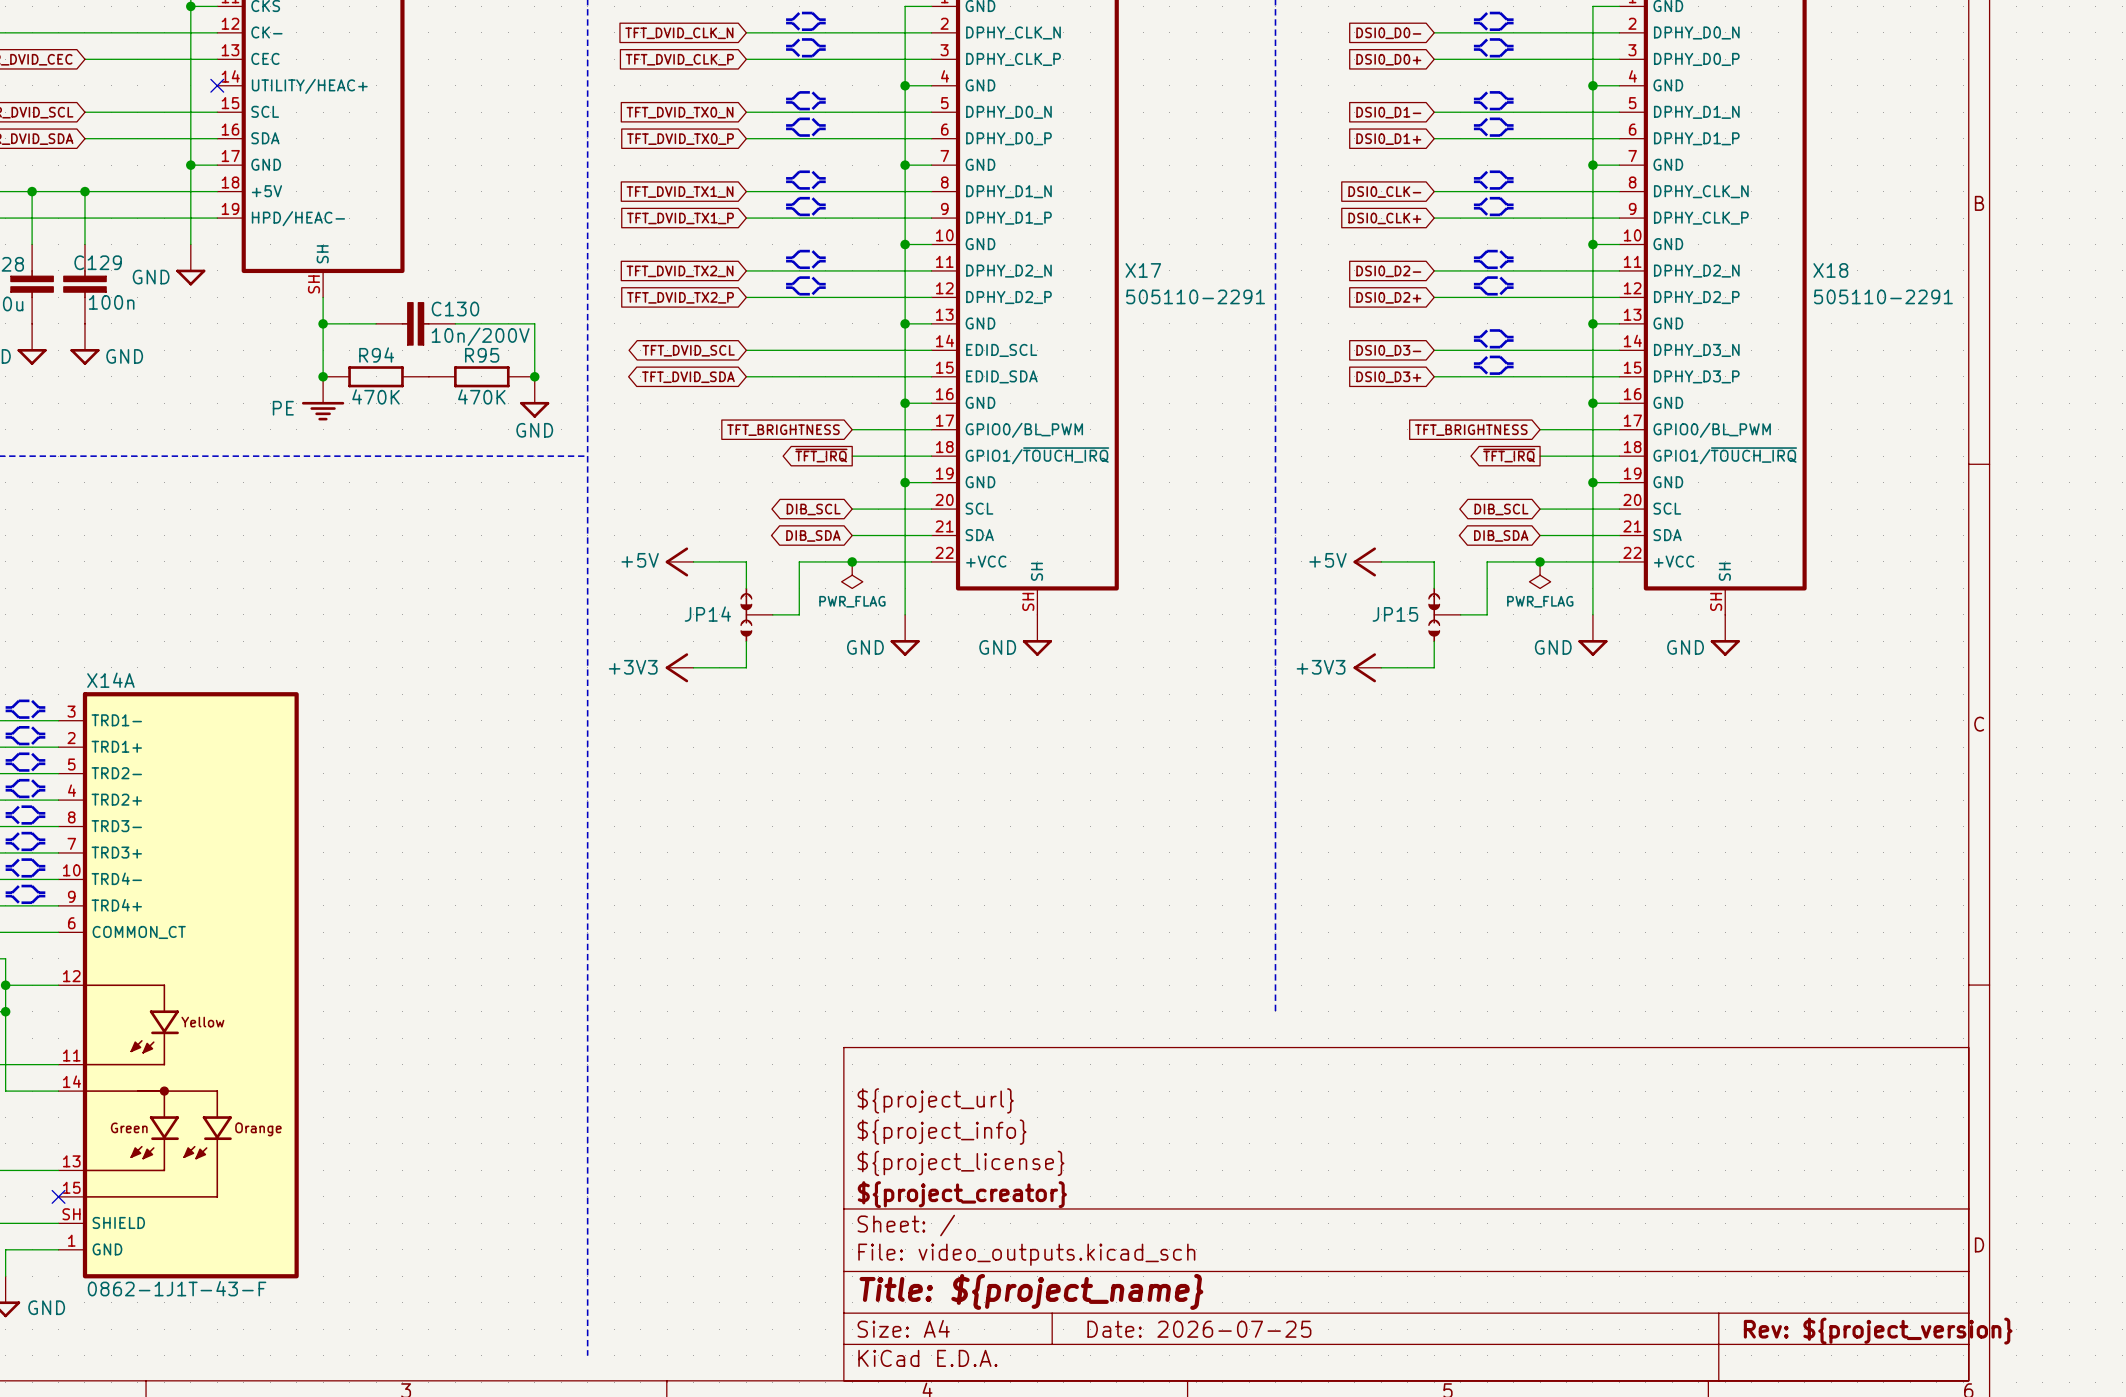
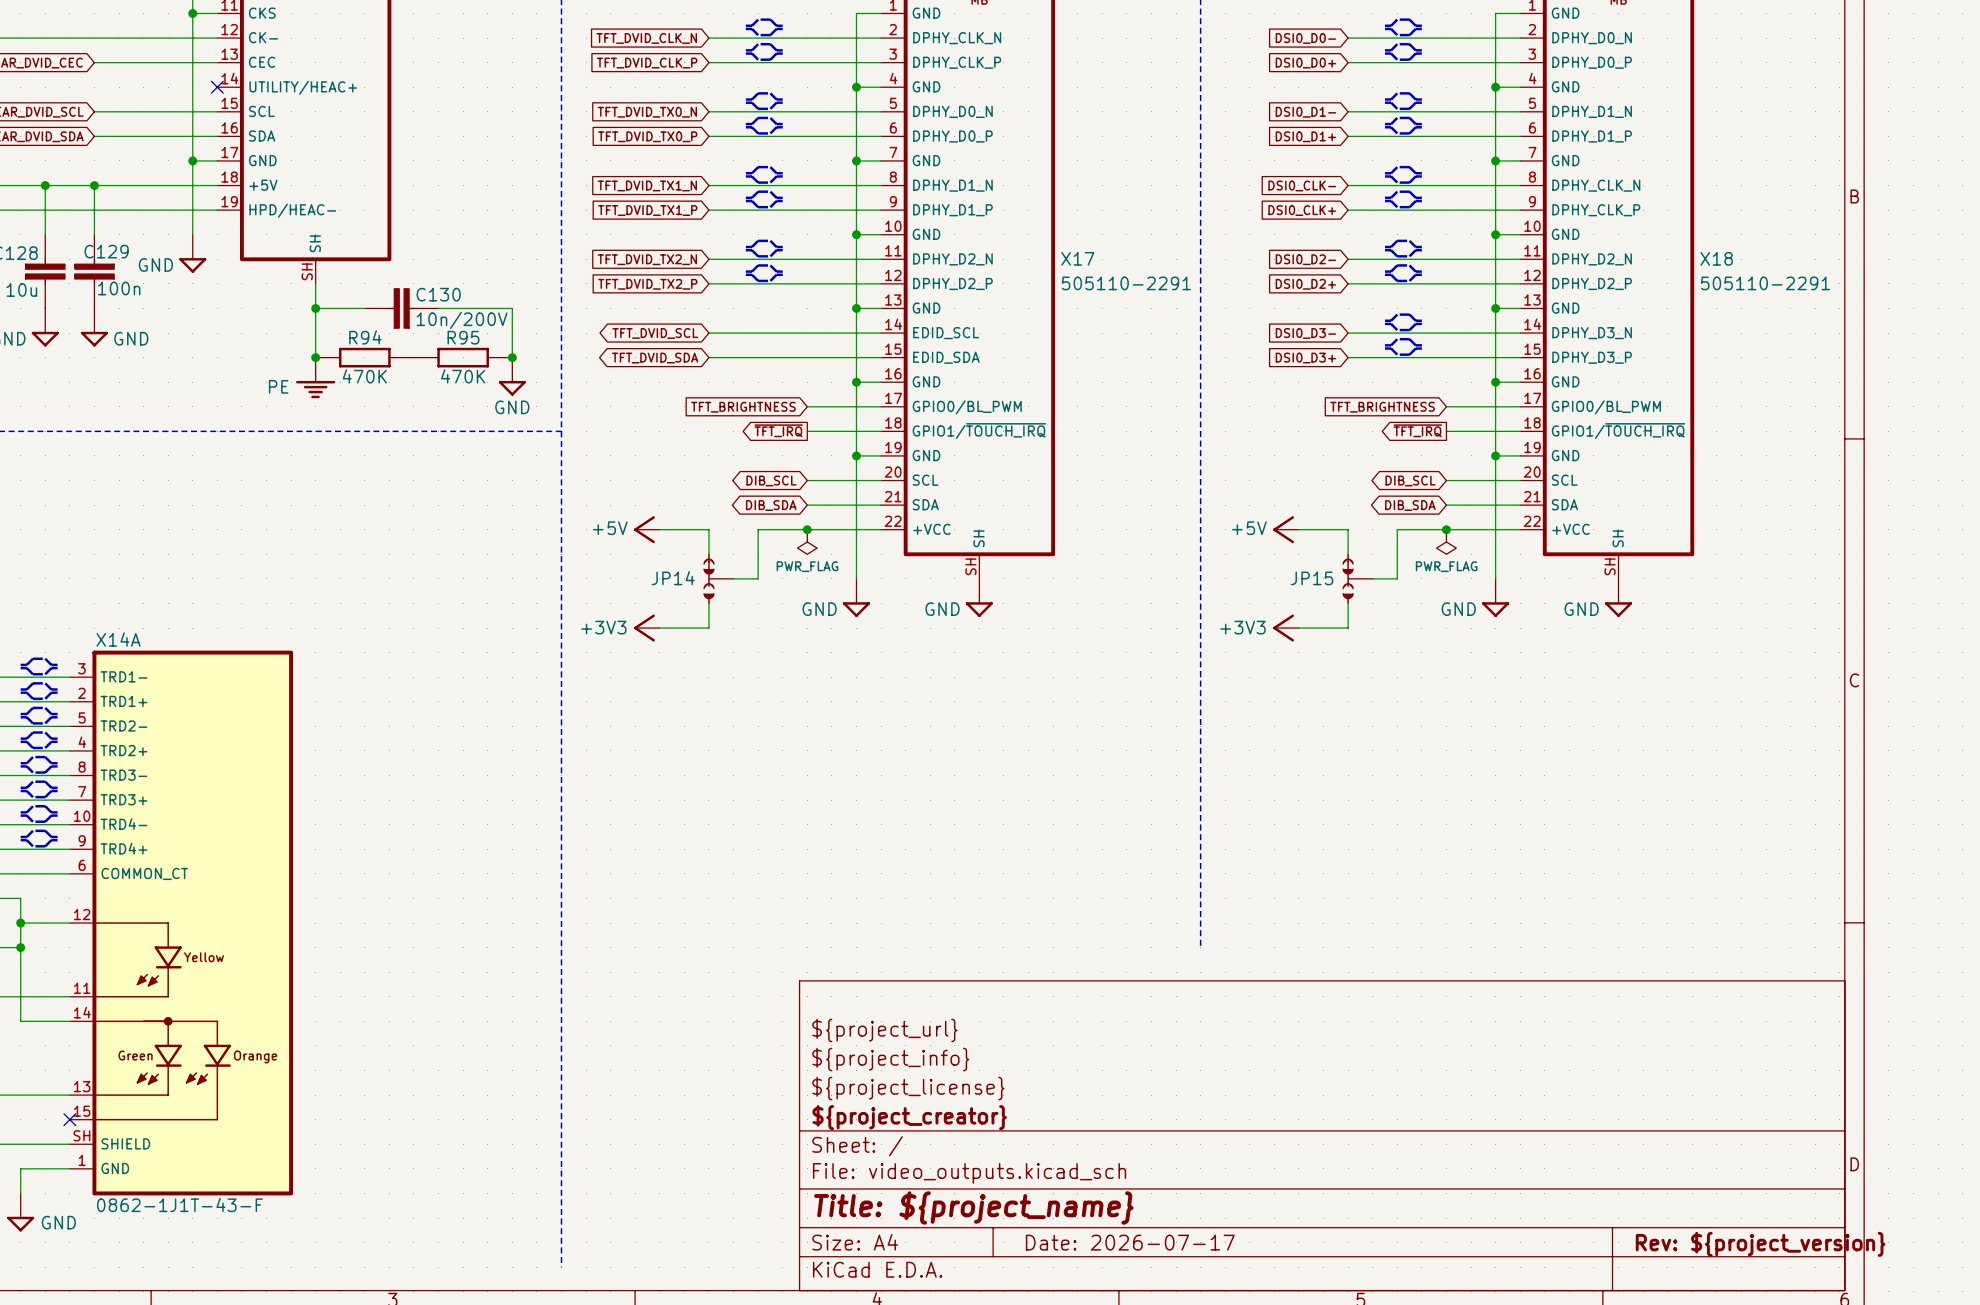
title block: Date: 2026-07-25 (1199, 1329) -> Date: 2026-07-17 (1130, 1242)

